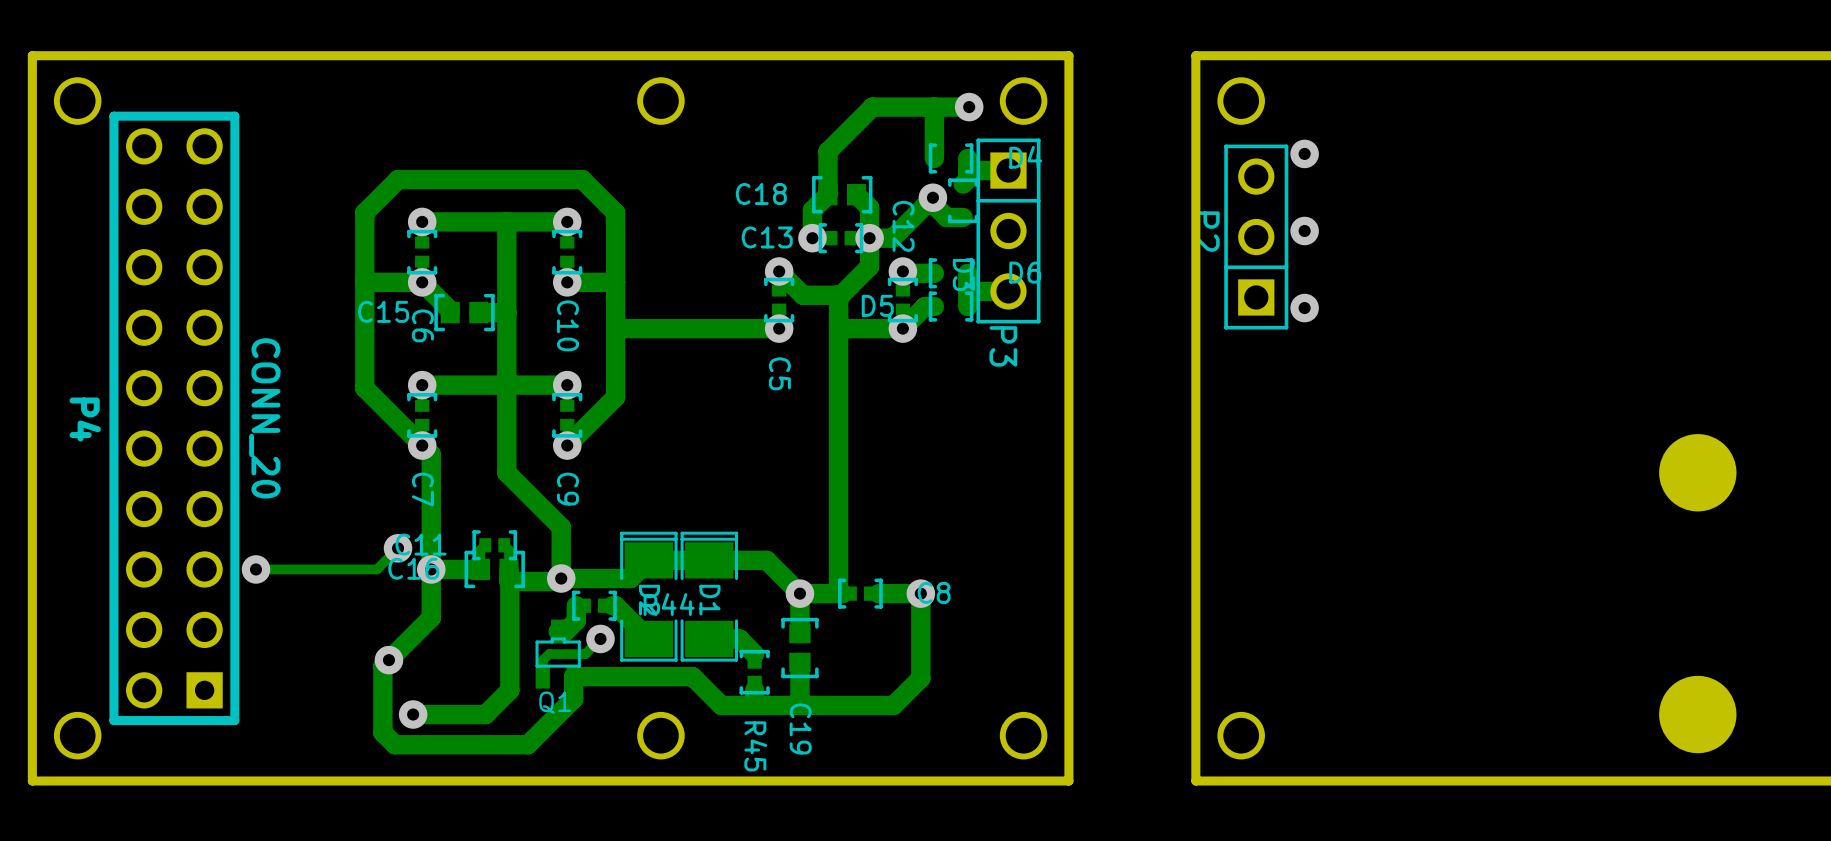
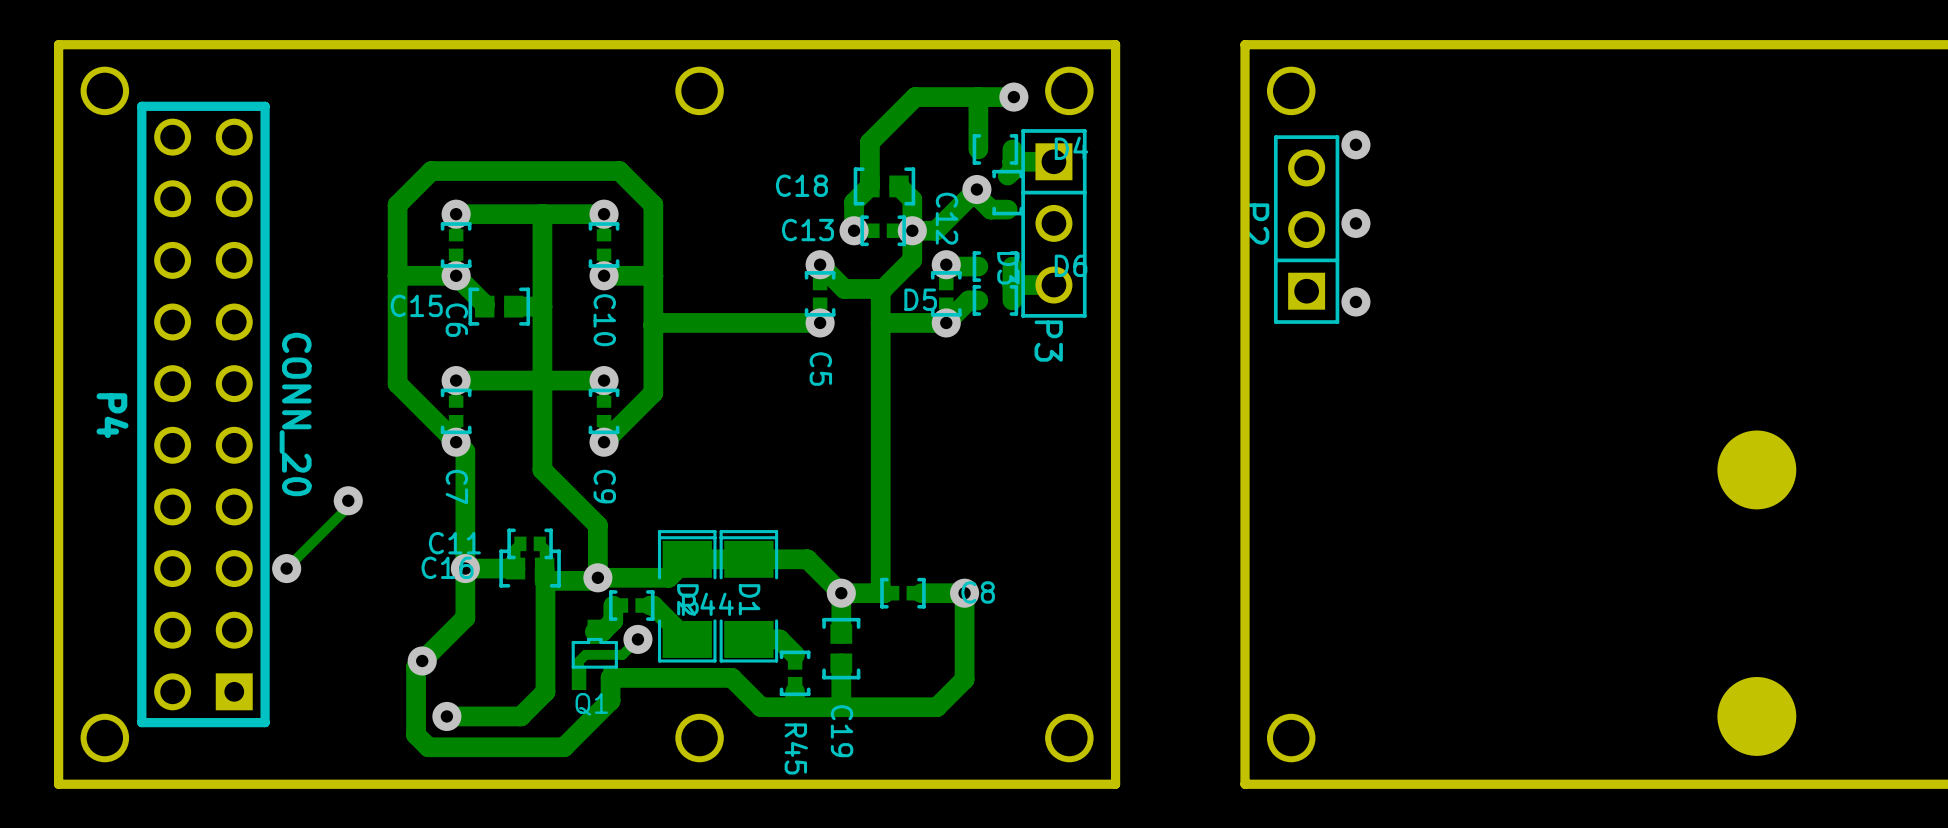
track: (398, 548) (376, 569) (255, 569) -> (348, 500) (348, 506) (286, 568)
via position: (398, 548) -> (348, 500)

